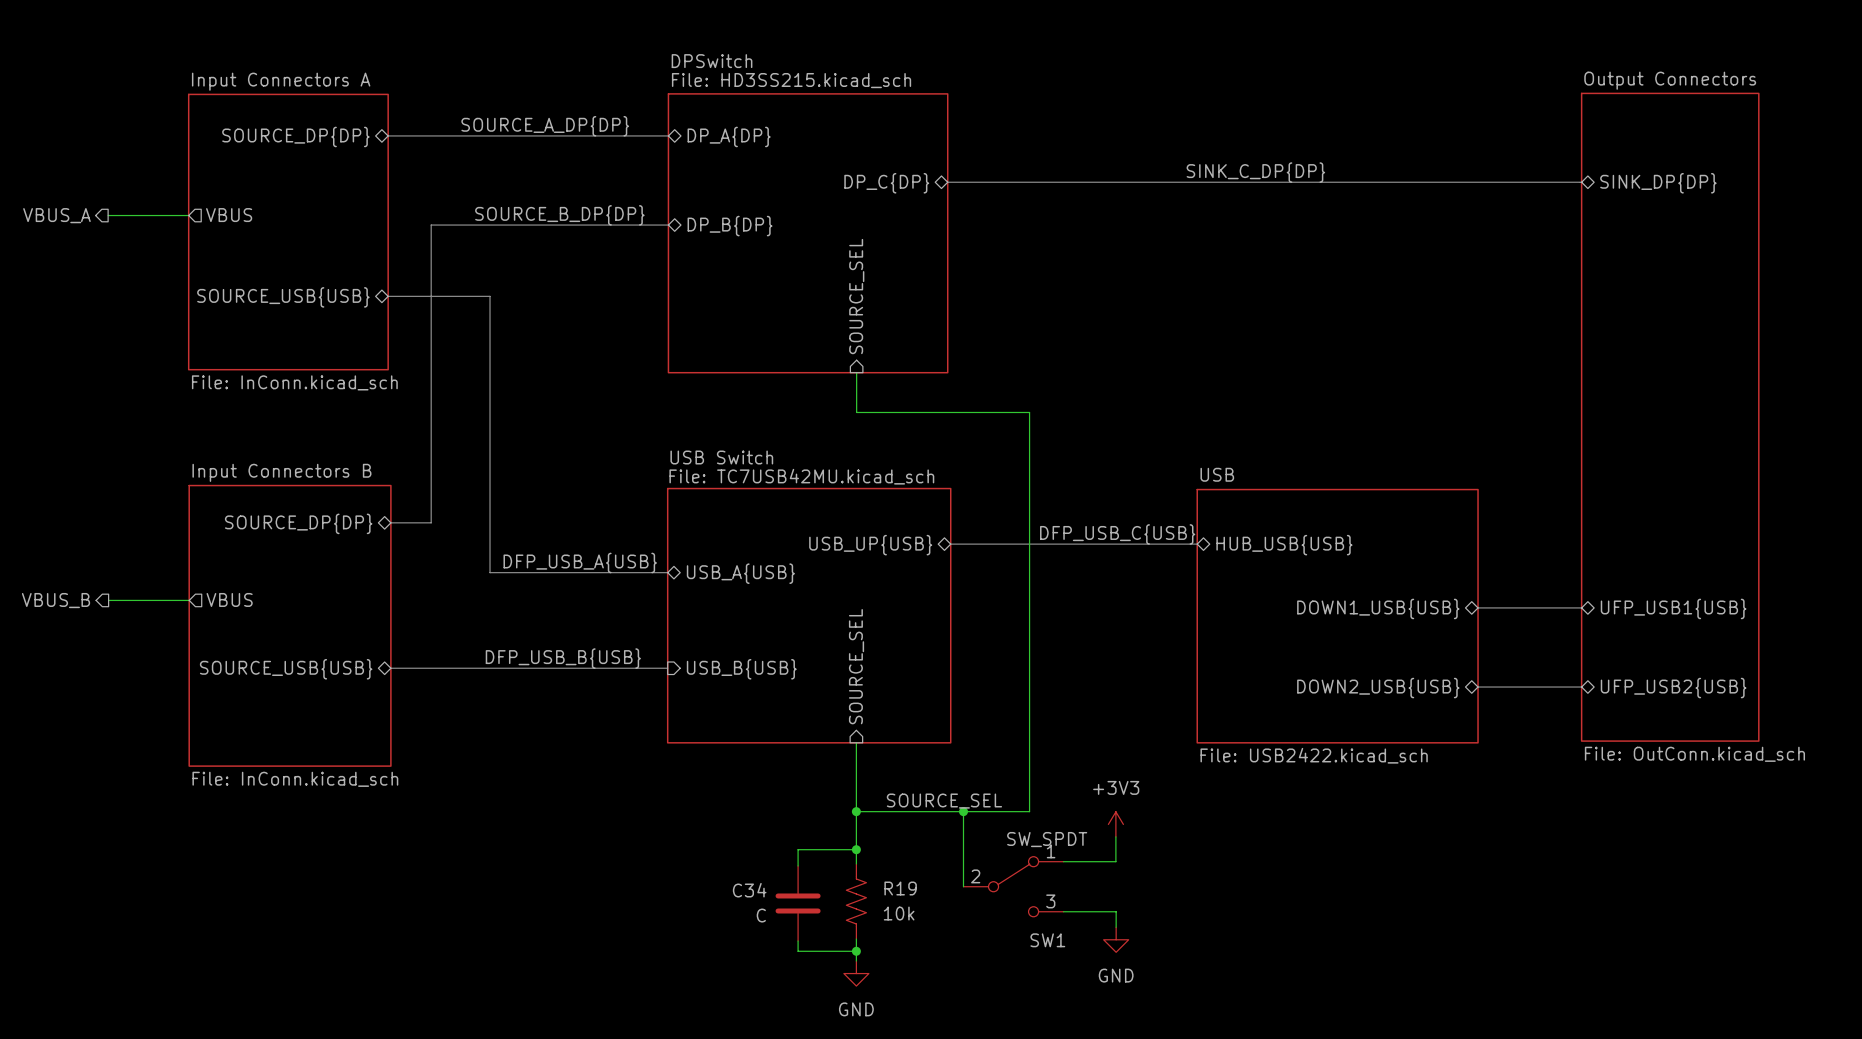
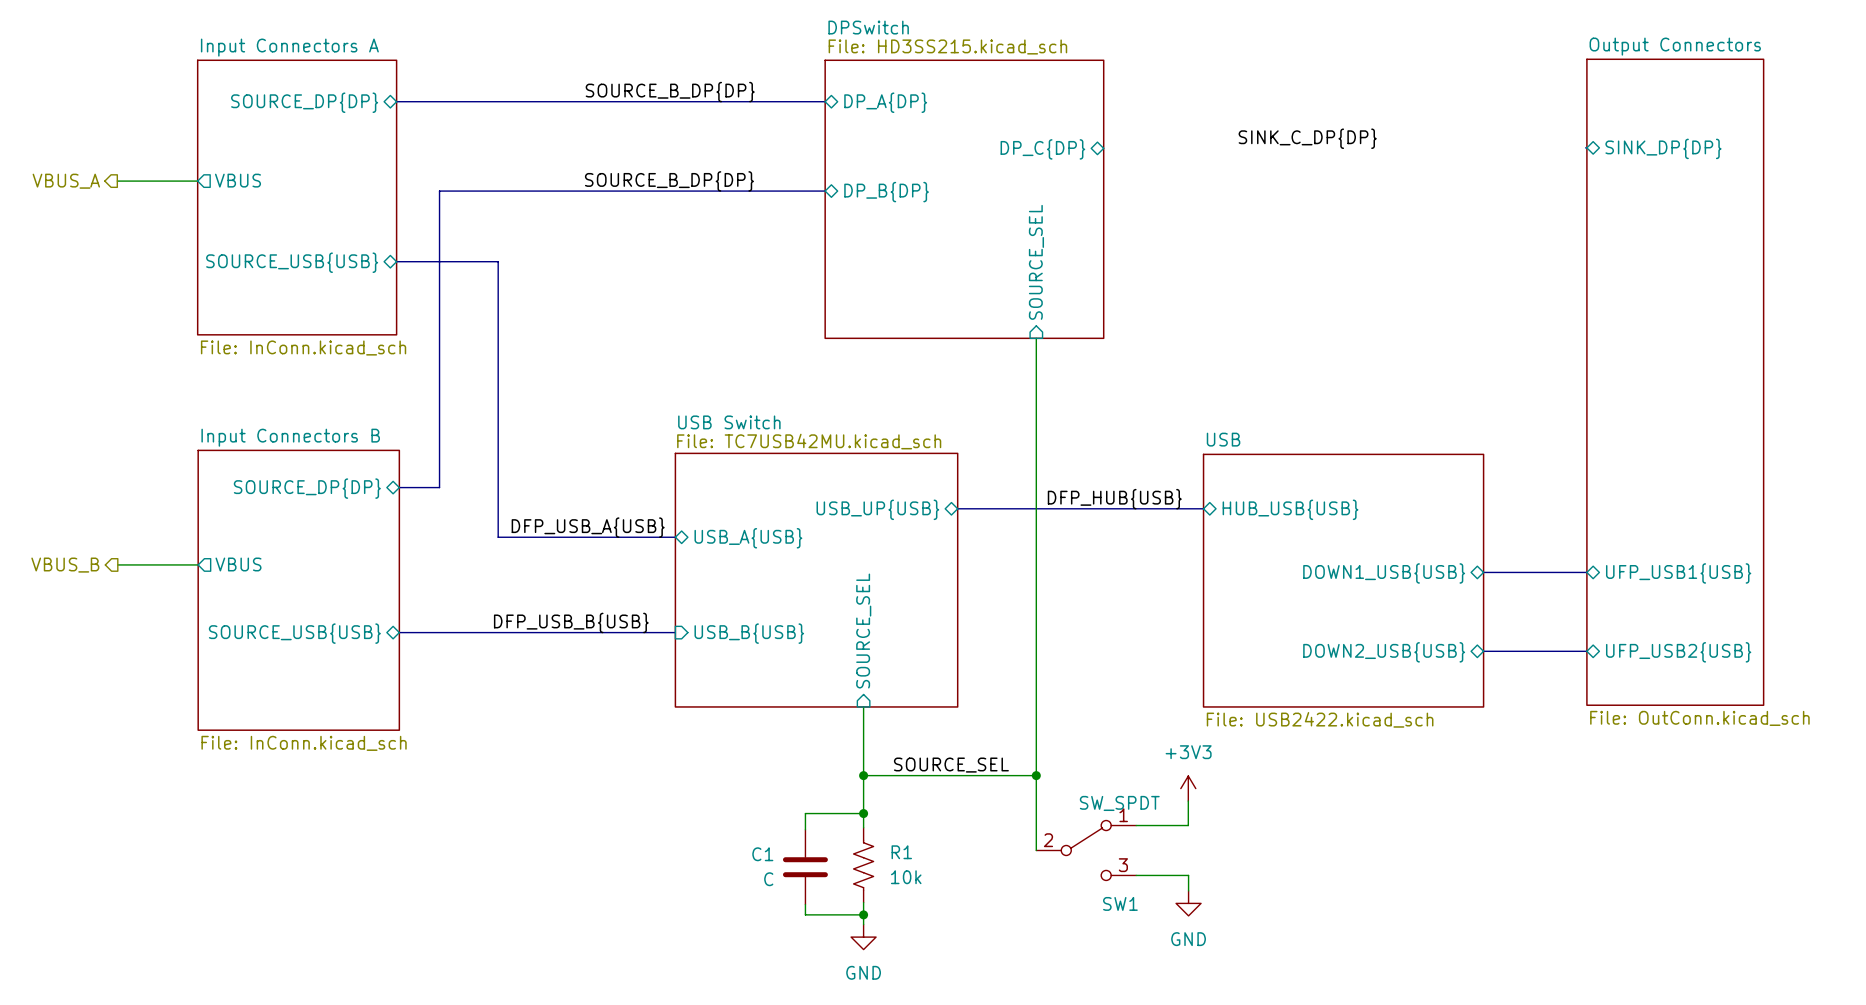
label: SOURCE_A_DP{DP} (545, 126) -> SOURCE_B_DP{DP} (670, 92)
bus: none -> (676, 101) (825, 101)
sheet pin position: DP_A{DP} (729, 136) -> DP_A{DP} (885, 102)
label position: SINK_C_DP{DP} (1255, 172) -> SINK_C_DP{DP} (1307, 138)
bus: (947, 182) (1579, 182) -> none
sheet pin position: DP_C{DP} (886, 183) -> DP_C{DP} (1042, 149)
label position: SOURCE_B_DP{DP} (559, 215) -> SOURCE_B_DP{DP} (669, 181)
bus: (668, 225) (431, 225) -> (825, 191) (439, 191)
sheet pin position: DP_B{DP} (730, 226) -> DP_B{DP} (886, 192)
sheet DPSwitch position: (808, 233) -> (964, 199)
sheet pin position: SOURCE_SEL (856, 296) -> SOURCE_SEL (1036, 262)
wire: (856, 372) (856, 412) (1029, 412) -> (1036, 338) (1036, 377)
label: DFP_USB_C{USB} (1117, 534) -> DFP_HUB{USB} (1114, 499)
wire: (963, 811) (963, 886) -> (1036, 775) (1036, 850)
junction: (963, 811) -> none
junction: none -> (1036, 775)
power symbol position: +3V3 (1115, 824) -> +3V3 (1188, 788)
wire: (1115, 836) (1115, 861) (1063, 861) -> none
wire: none -> (1188, 801) (1188, 825) (1136, 825)
SW1 position: (1013, 886) -> (1086, 850)
R19 name: R19 (900, 888) -> R1 (901, 852)
C34 name: C34 (749, 890) -> C1 (762, 854)
wire: (1063, 911) (1116, 911) (1116, 927) -> (1136, 875) (1188, 875) (1188, 890)
power symbol position: GND (1116, 939) -> GND (1188, 903)

